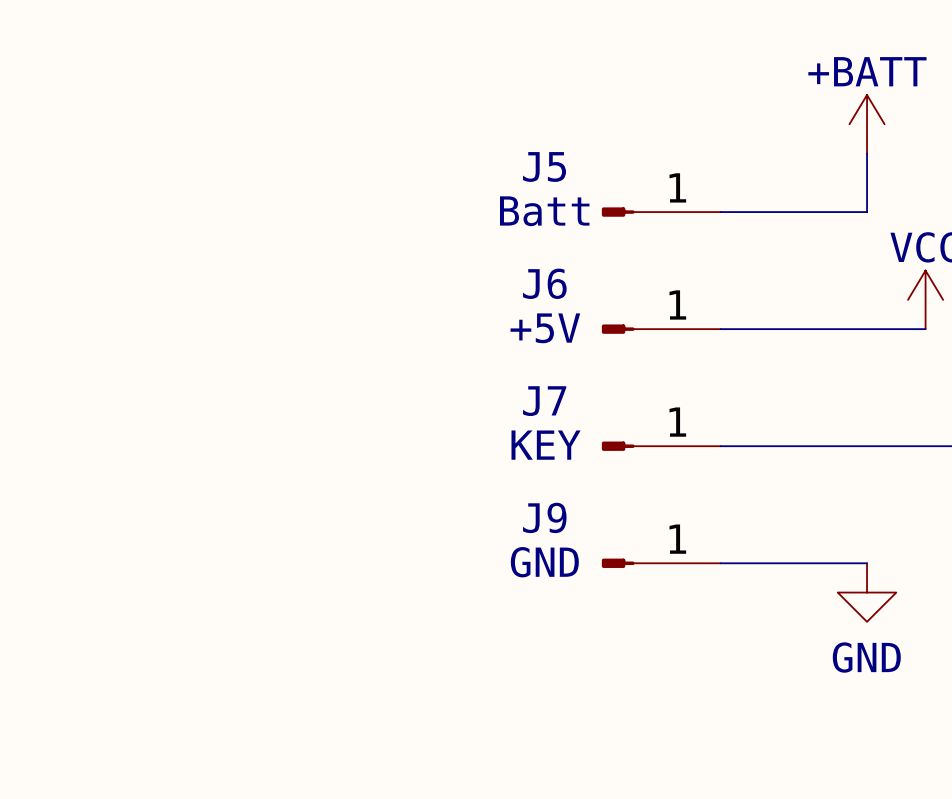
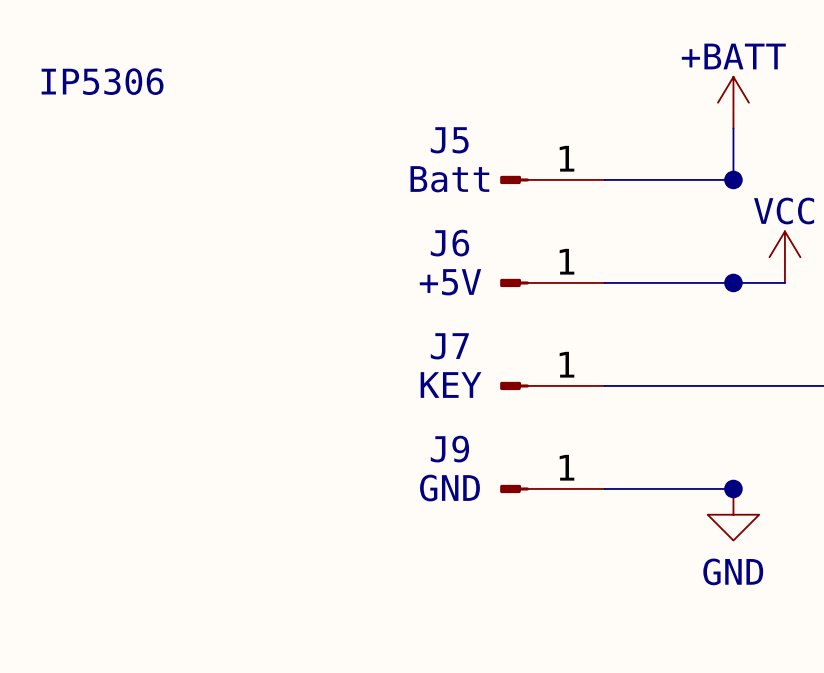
text: none -> IP5306 (102, 81)
junction: none -> (733, 179)
junction: none -> (733, 282)
junction: none -> (733, 488)

